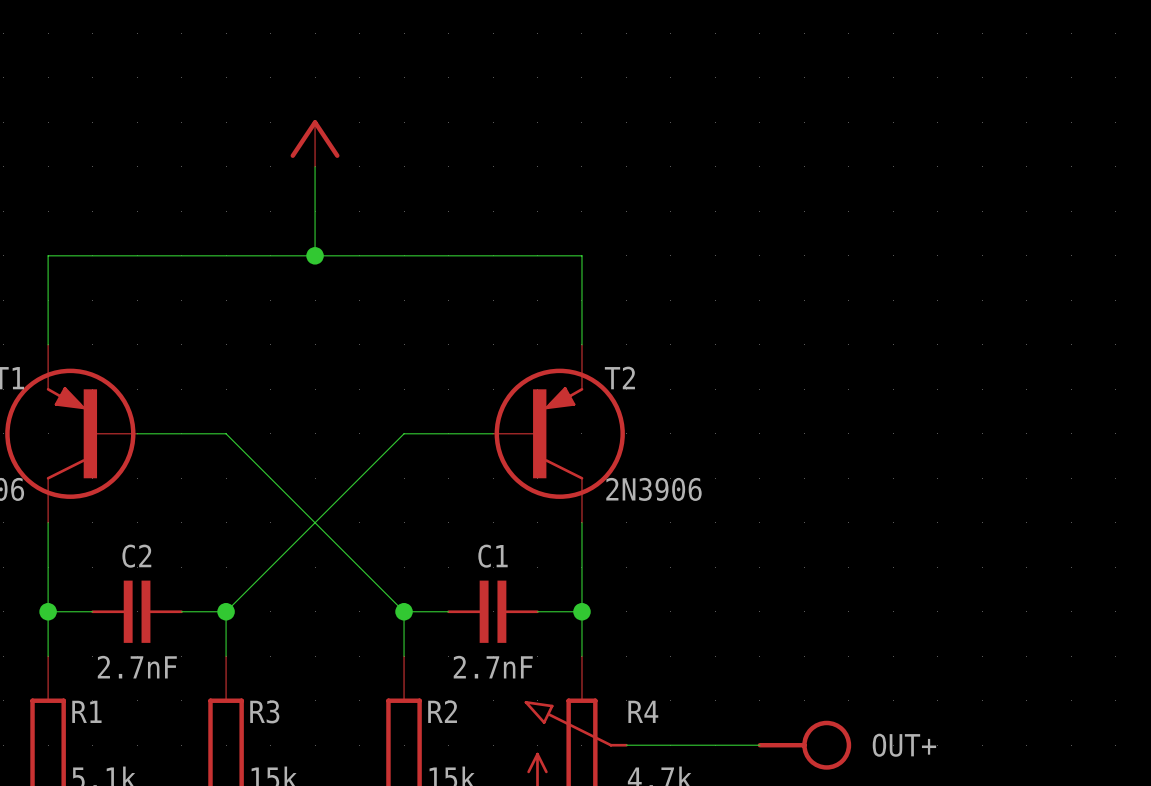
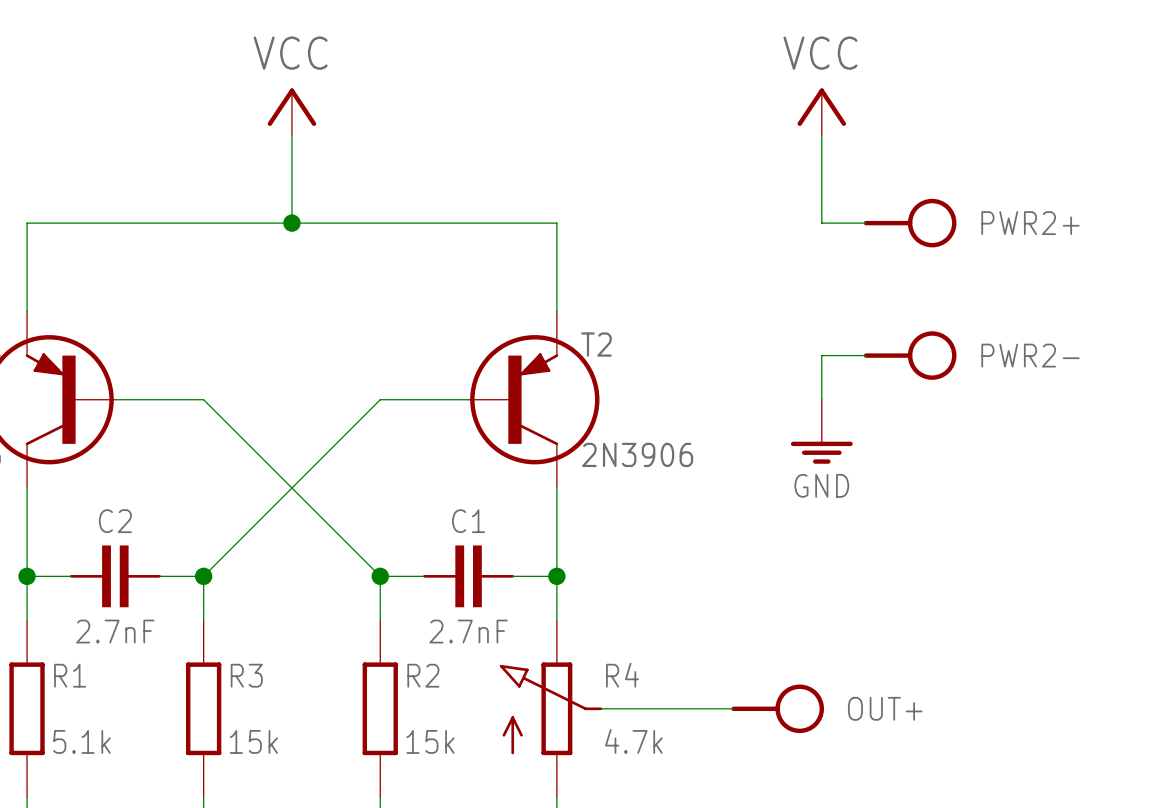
part text: none -> VCC (290, 53)
power symbol: none -> VCC (821, 111)
wire: none -> (821, 134) (821, 223) (865, 223)
PWR2+: none -> (910, 223)
wire: none -> (865, 355) (821, 355) (821, 399)
PWR2-: none -> (910, 355)
power symbol: none -> GND (821, 431)

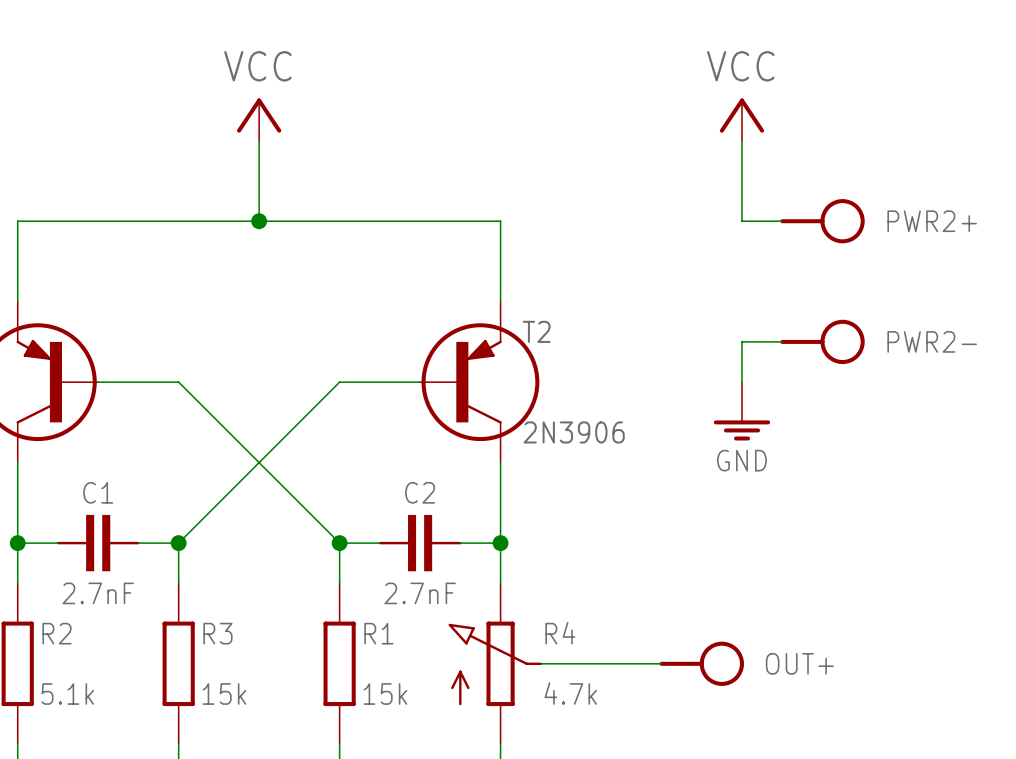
C2 name: C2 (115, 521) -> C1 (98, 492)
C1 name: C1 (468, 521) -> C2 (420, 492)
R1 name: R1 (70, 675) -> R2 (57, 633)
R2 name: R2 (423, 675) -> R1 (378, 633)

